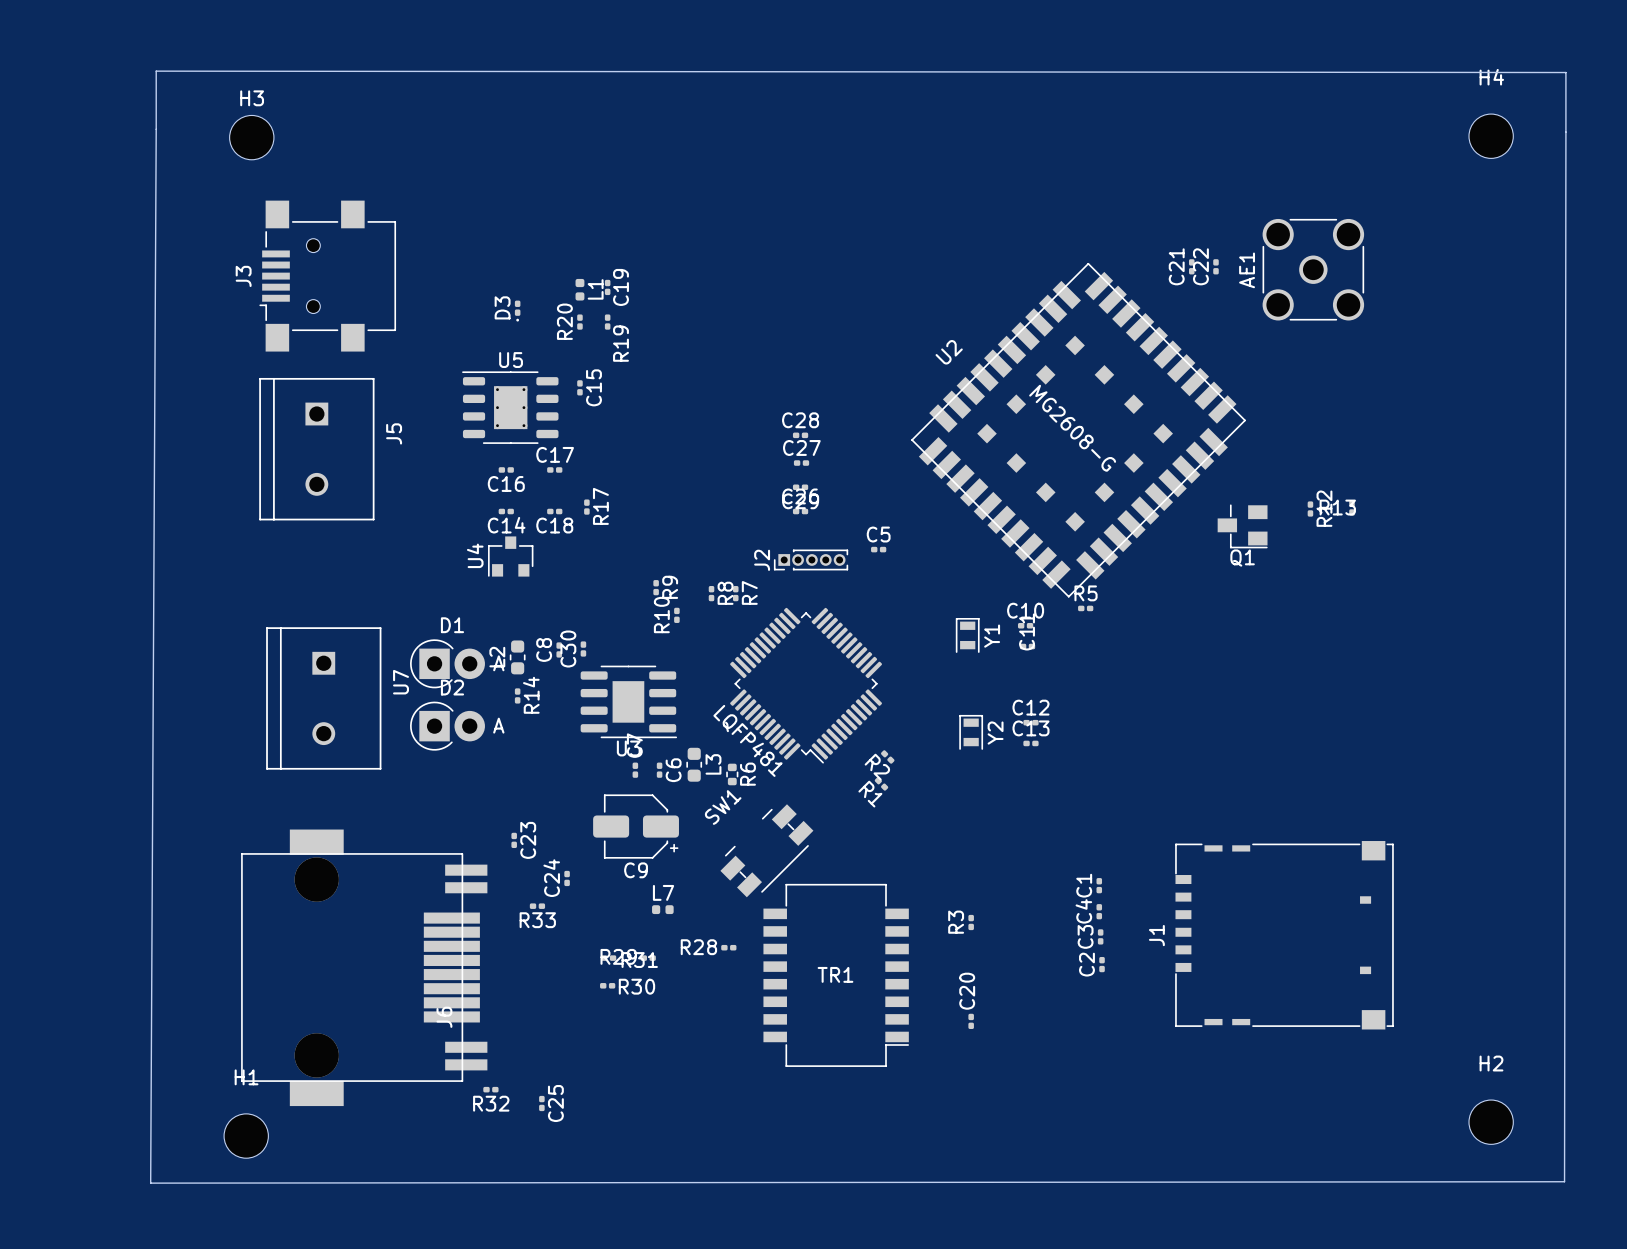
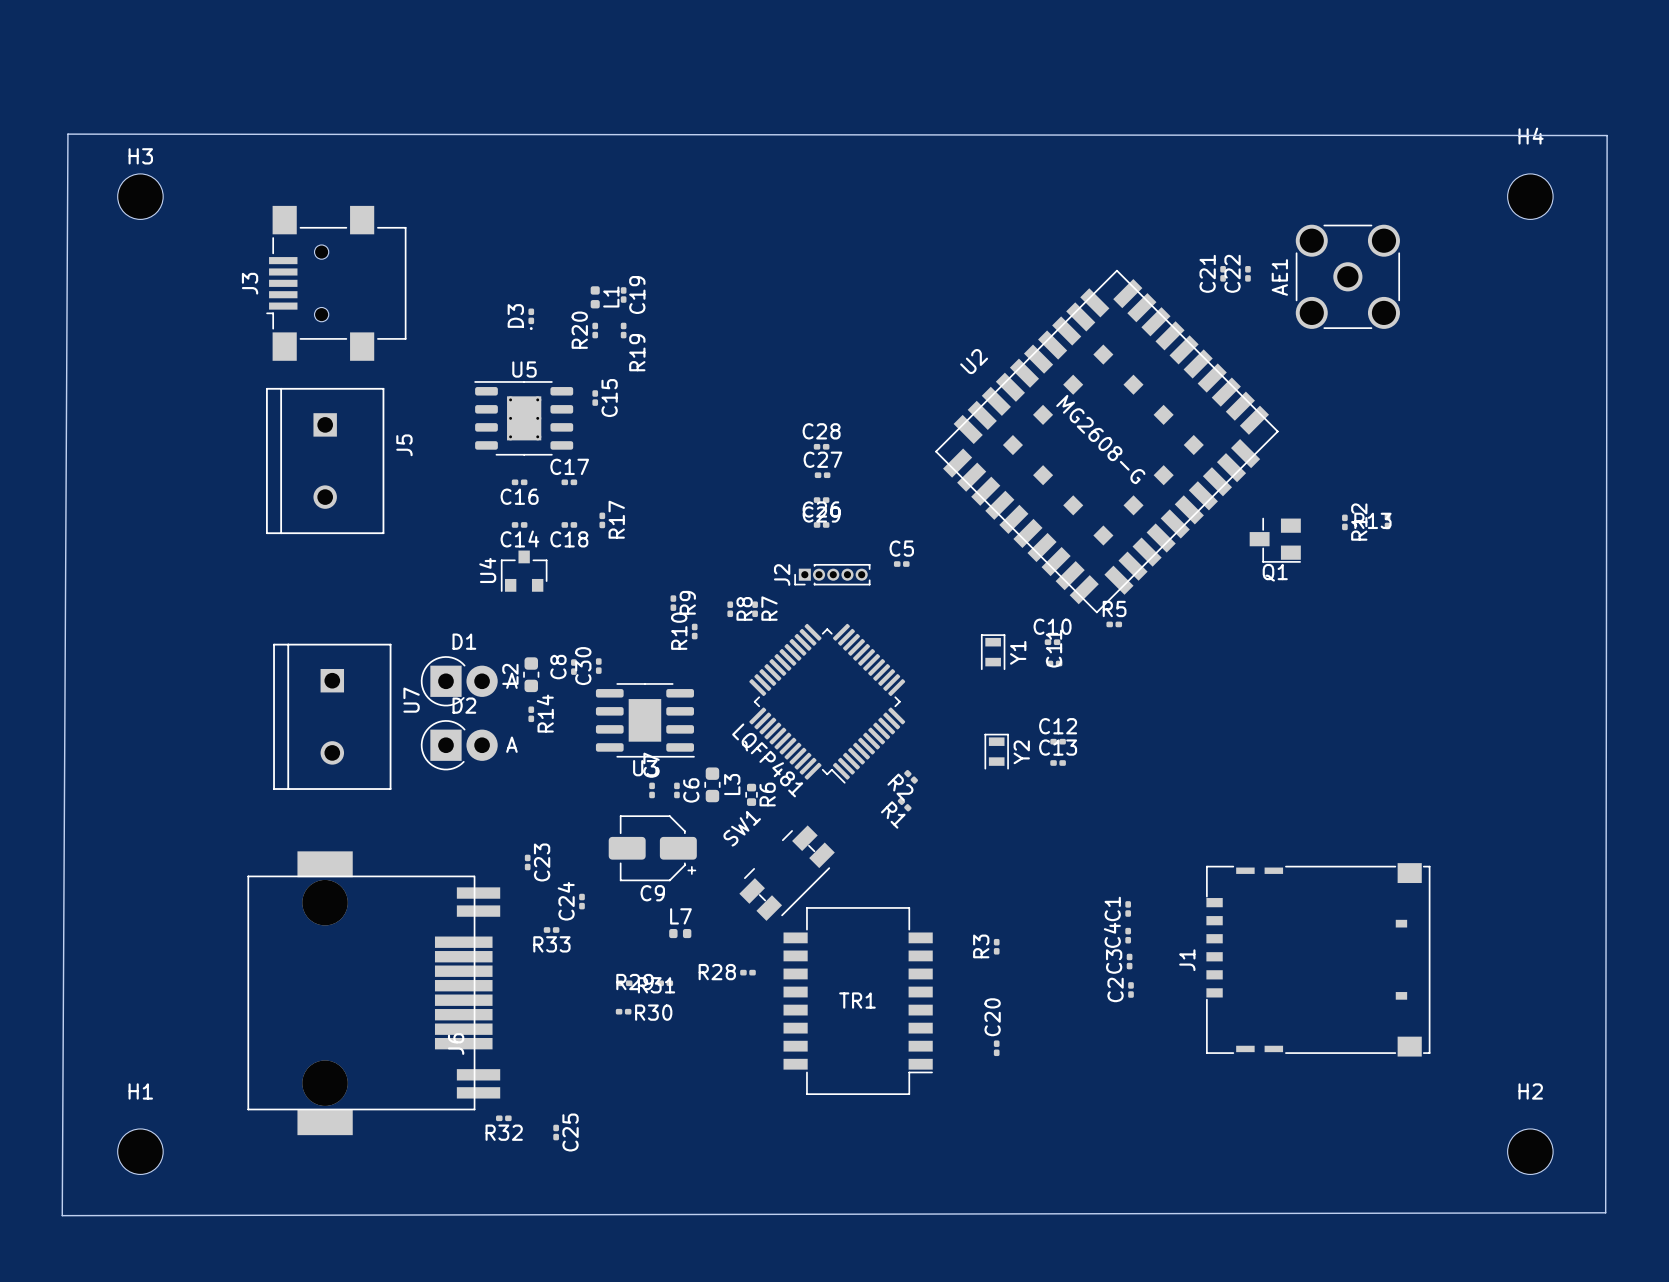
board edge: (1565, 132) (1565, 72) (156, 71) (150, 1183) (1564, 1181) -> (1607, 135) (67, 134) (62, 1215) (1605, 1212)
H4 position: (1491, 136) -> (1530, 196)
H3 position: (251, 137) -> (140, 196)
H1 position: (246, 1136) -> (140, 1151)

